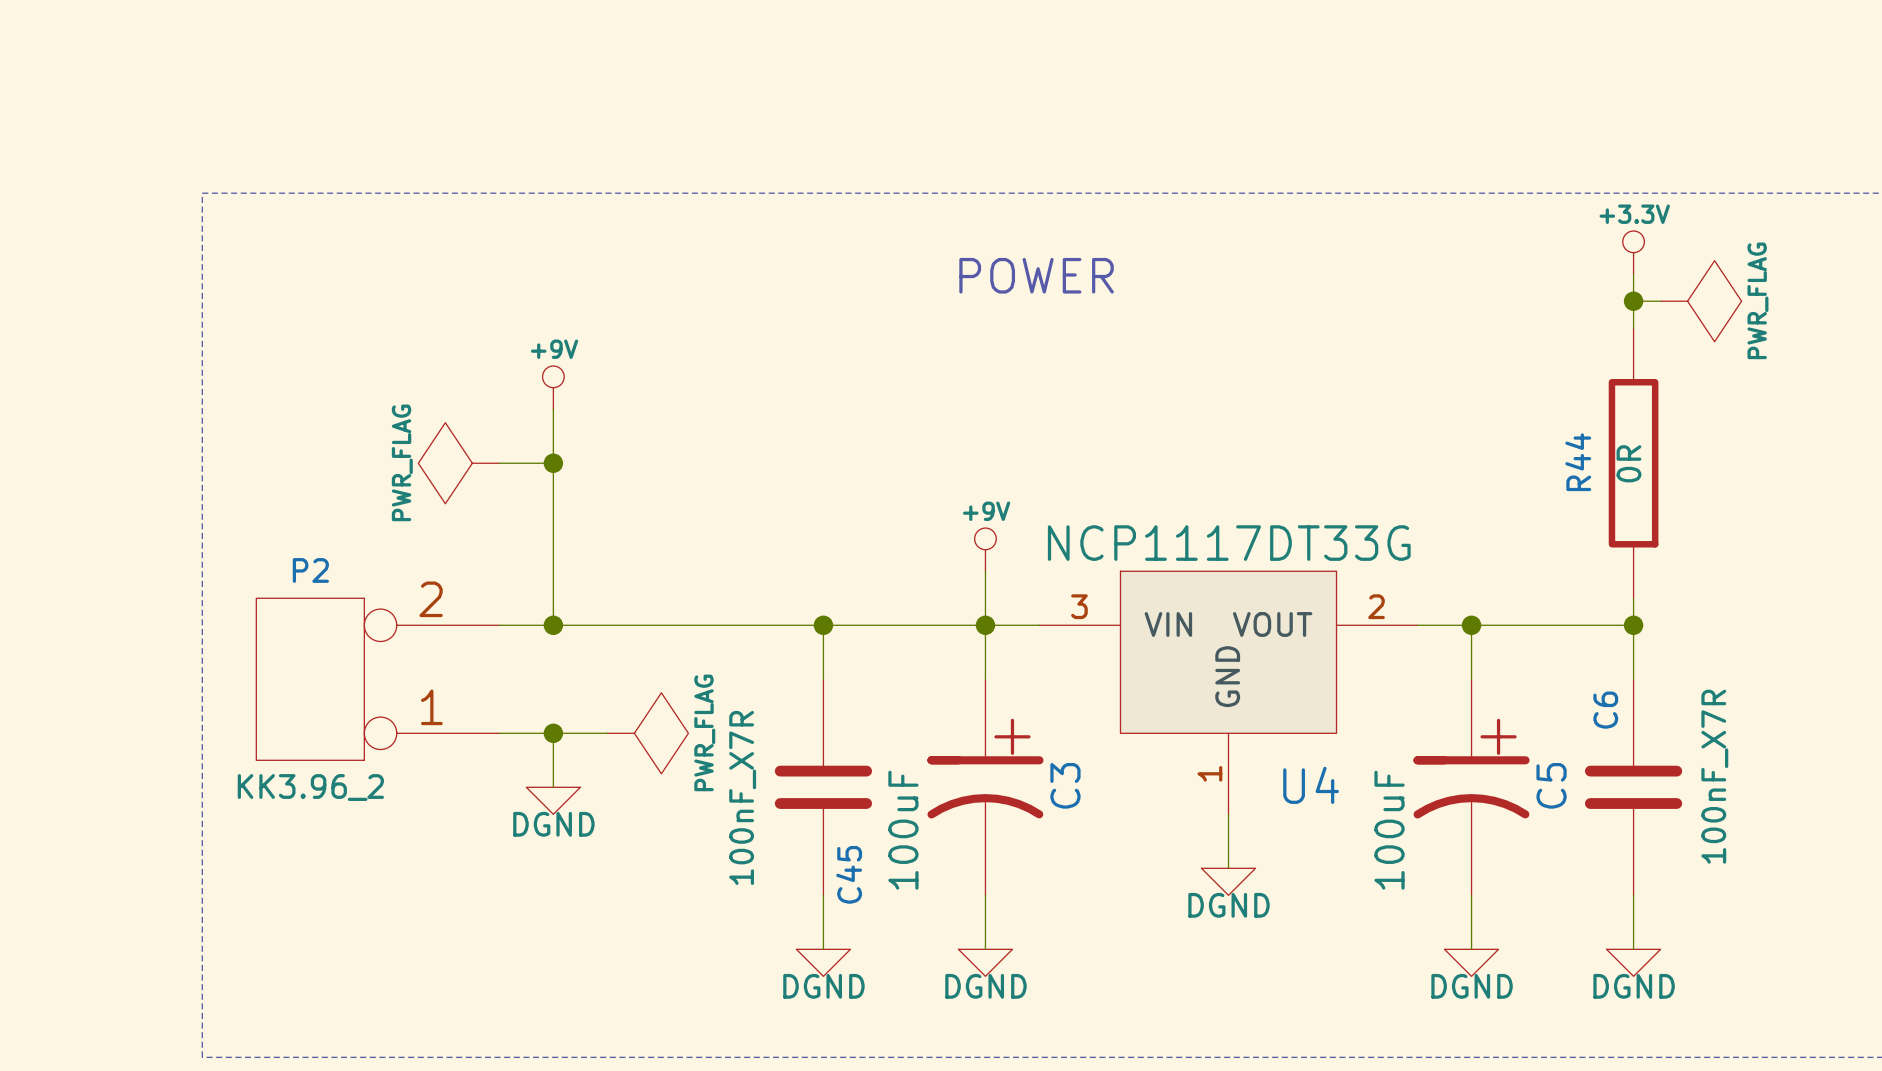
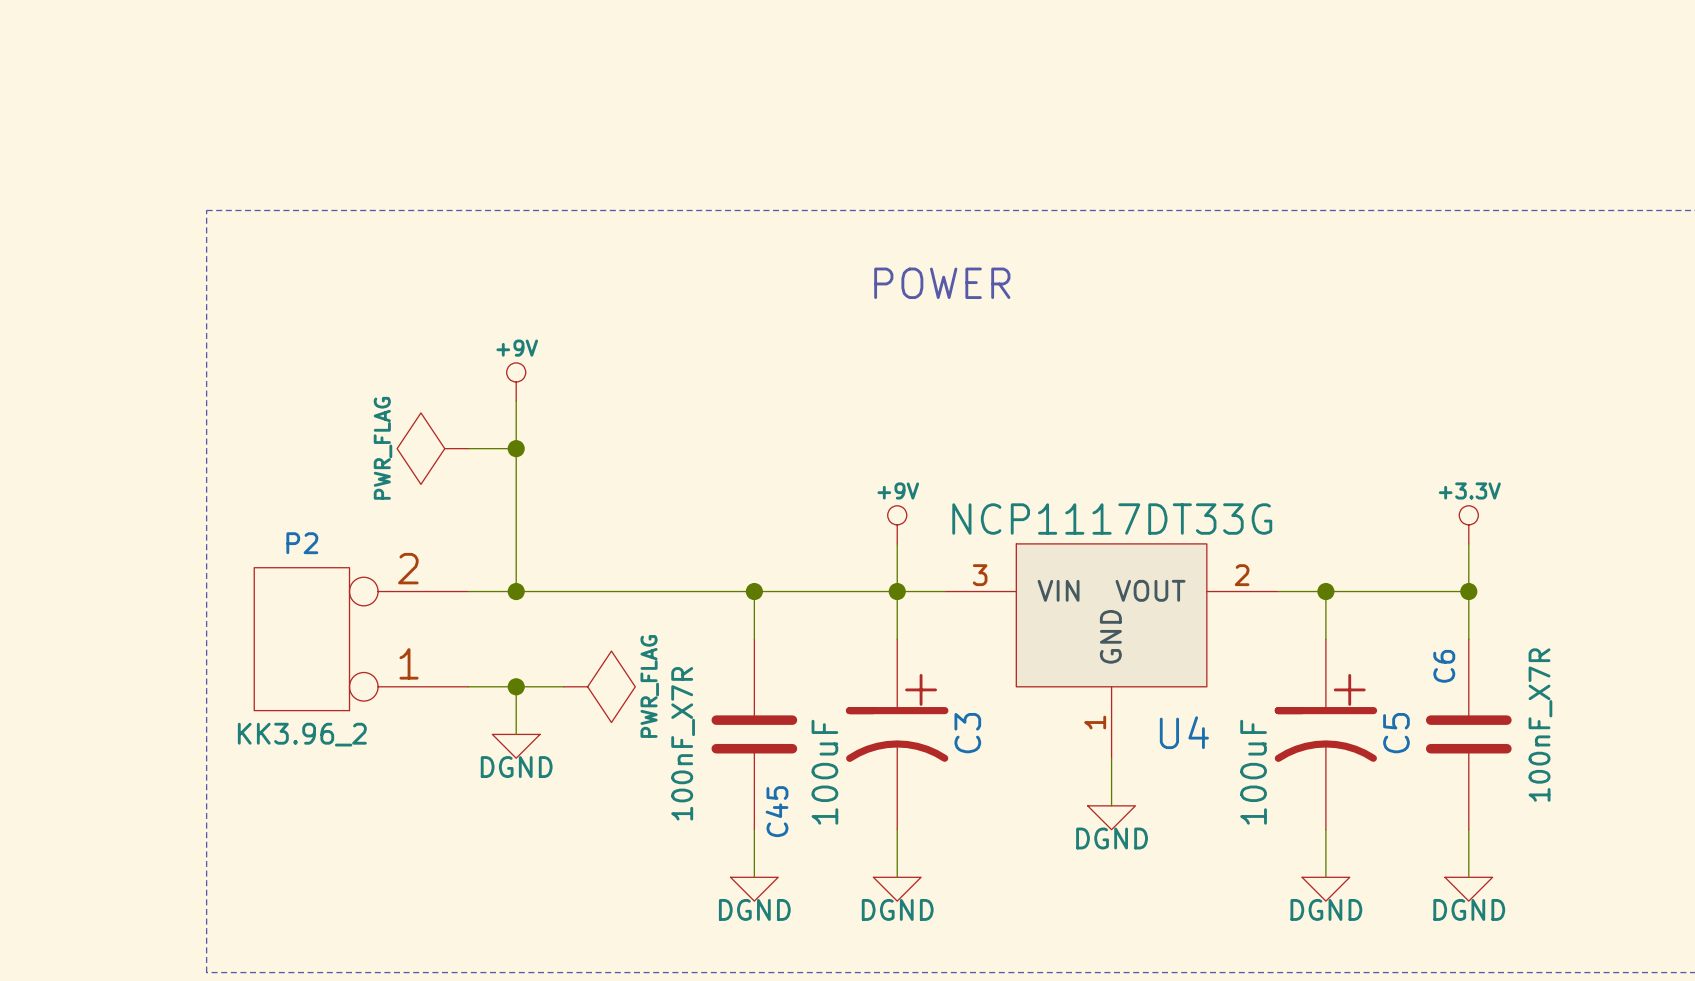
power symbol position: +3.3V (1633, 252) -> +3.3V (1468, 524)
wire: (1633, 274) (1633, 328) -> none
wire: (1633, 301) (1660, 301) -> none
junction: (1633, 301) -> none
power symbol: PWR_FLAG (1701, 301) -> none
R44: 0R (1633, 463) -> none

